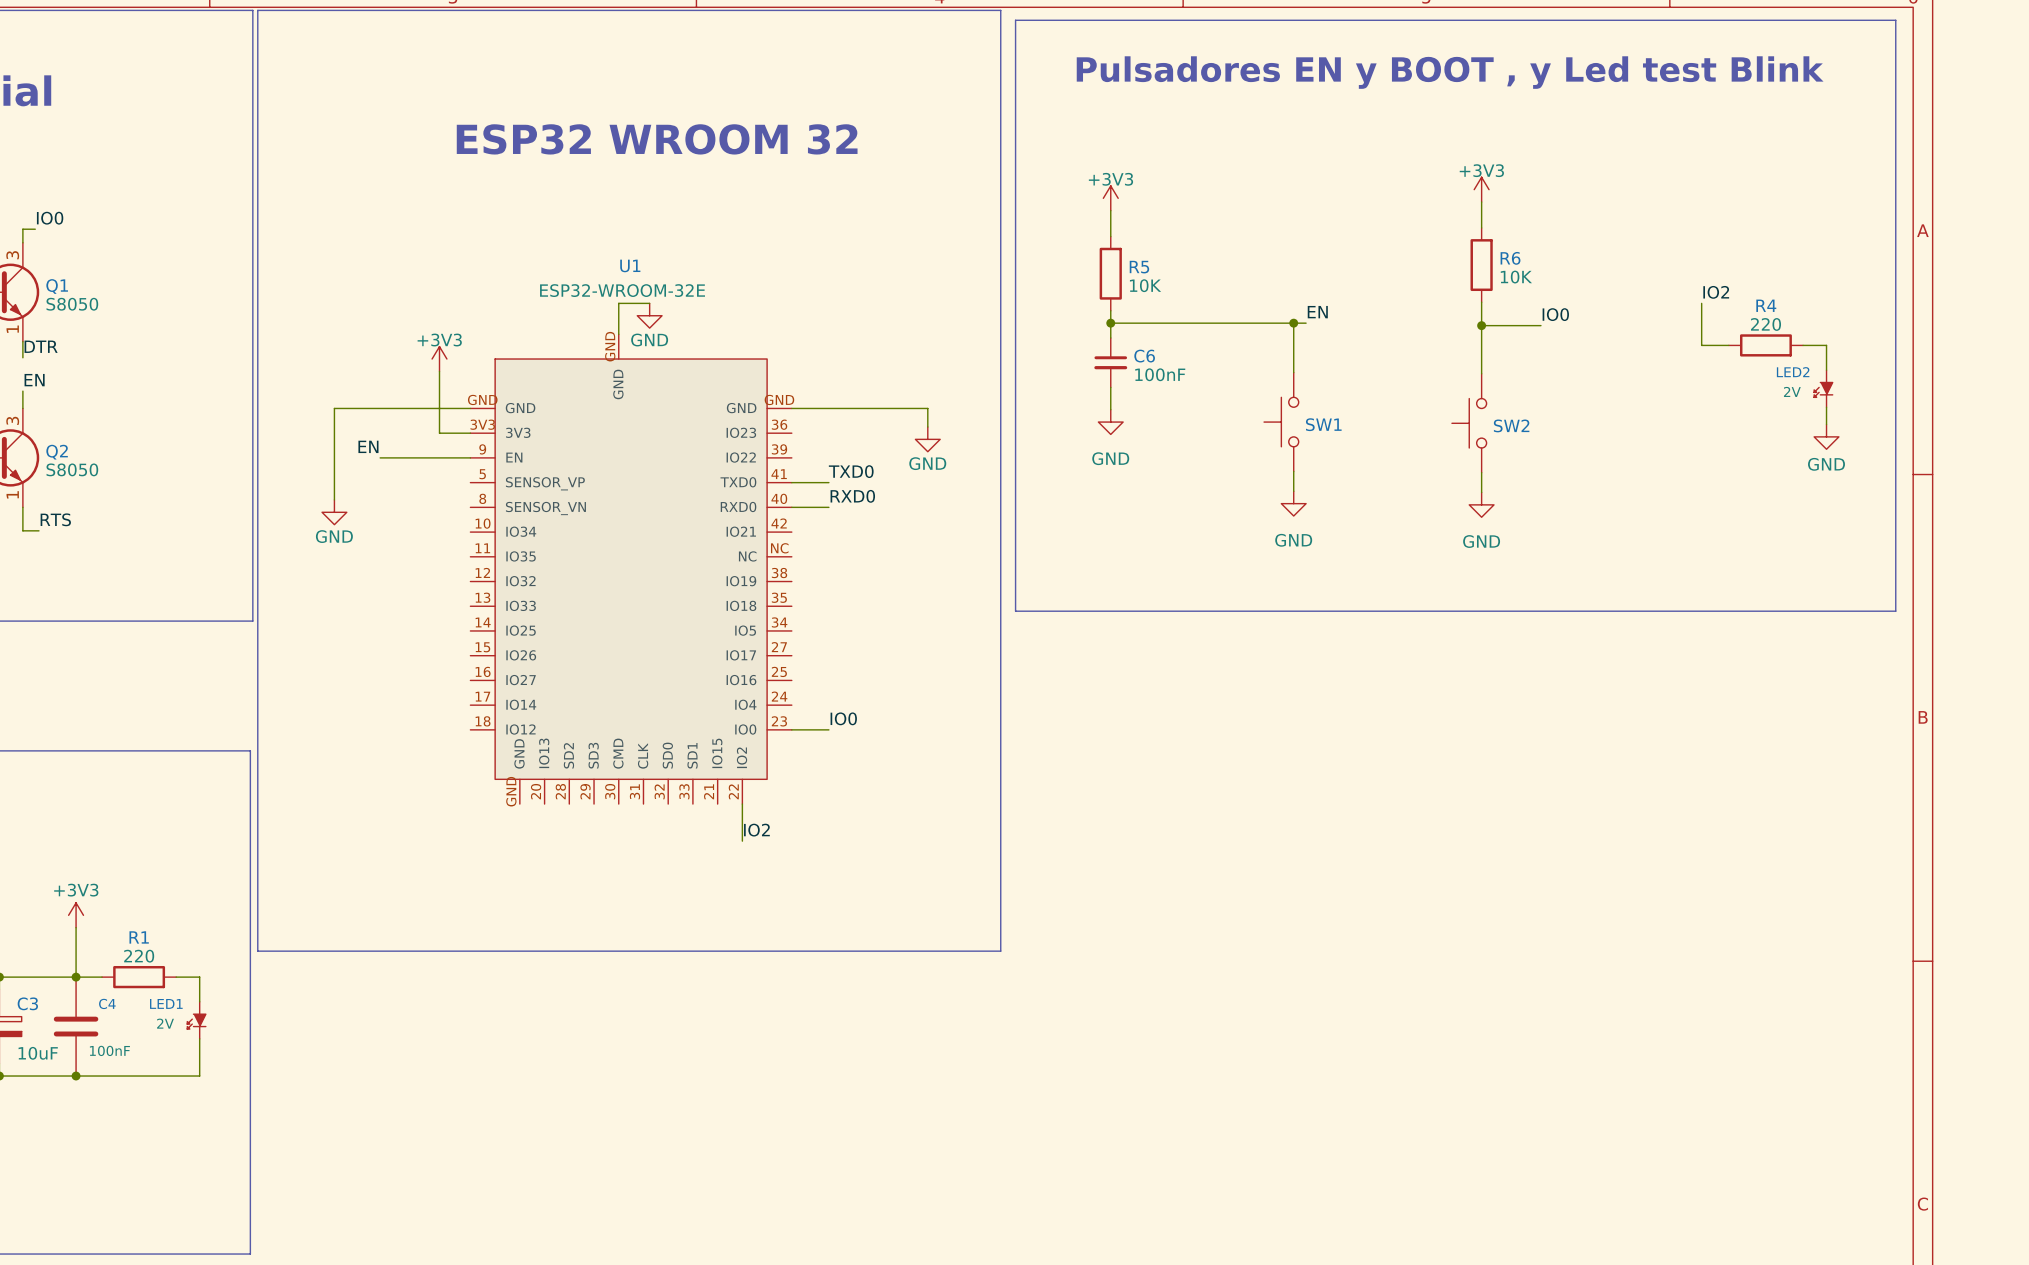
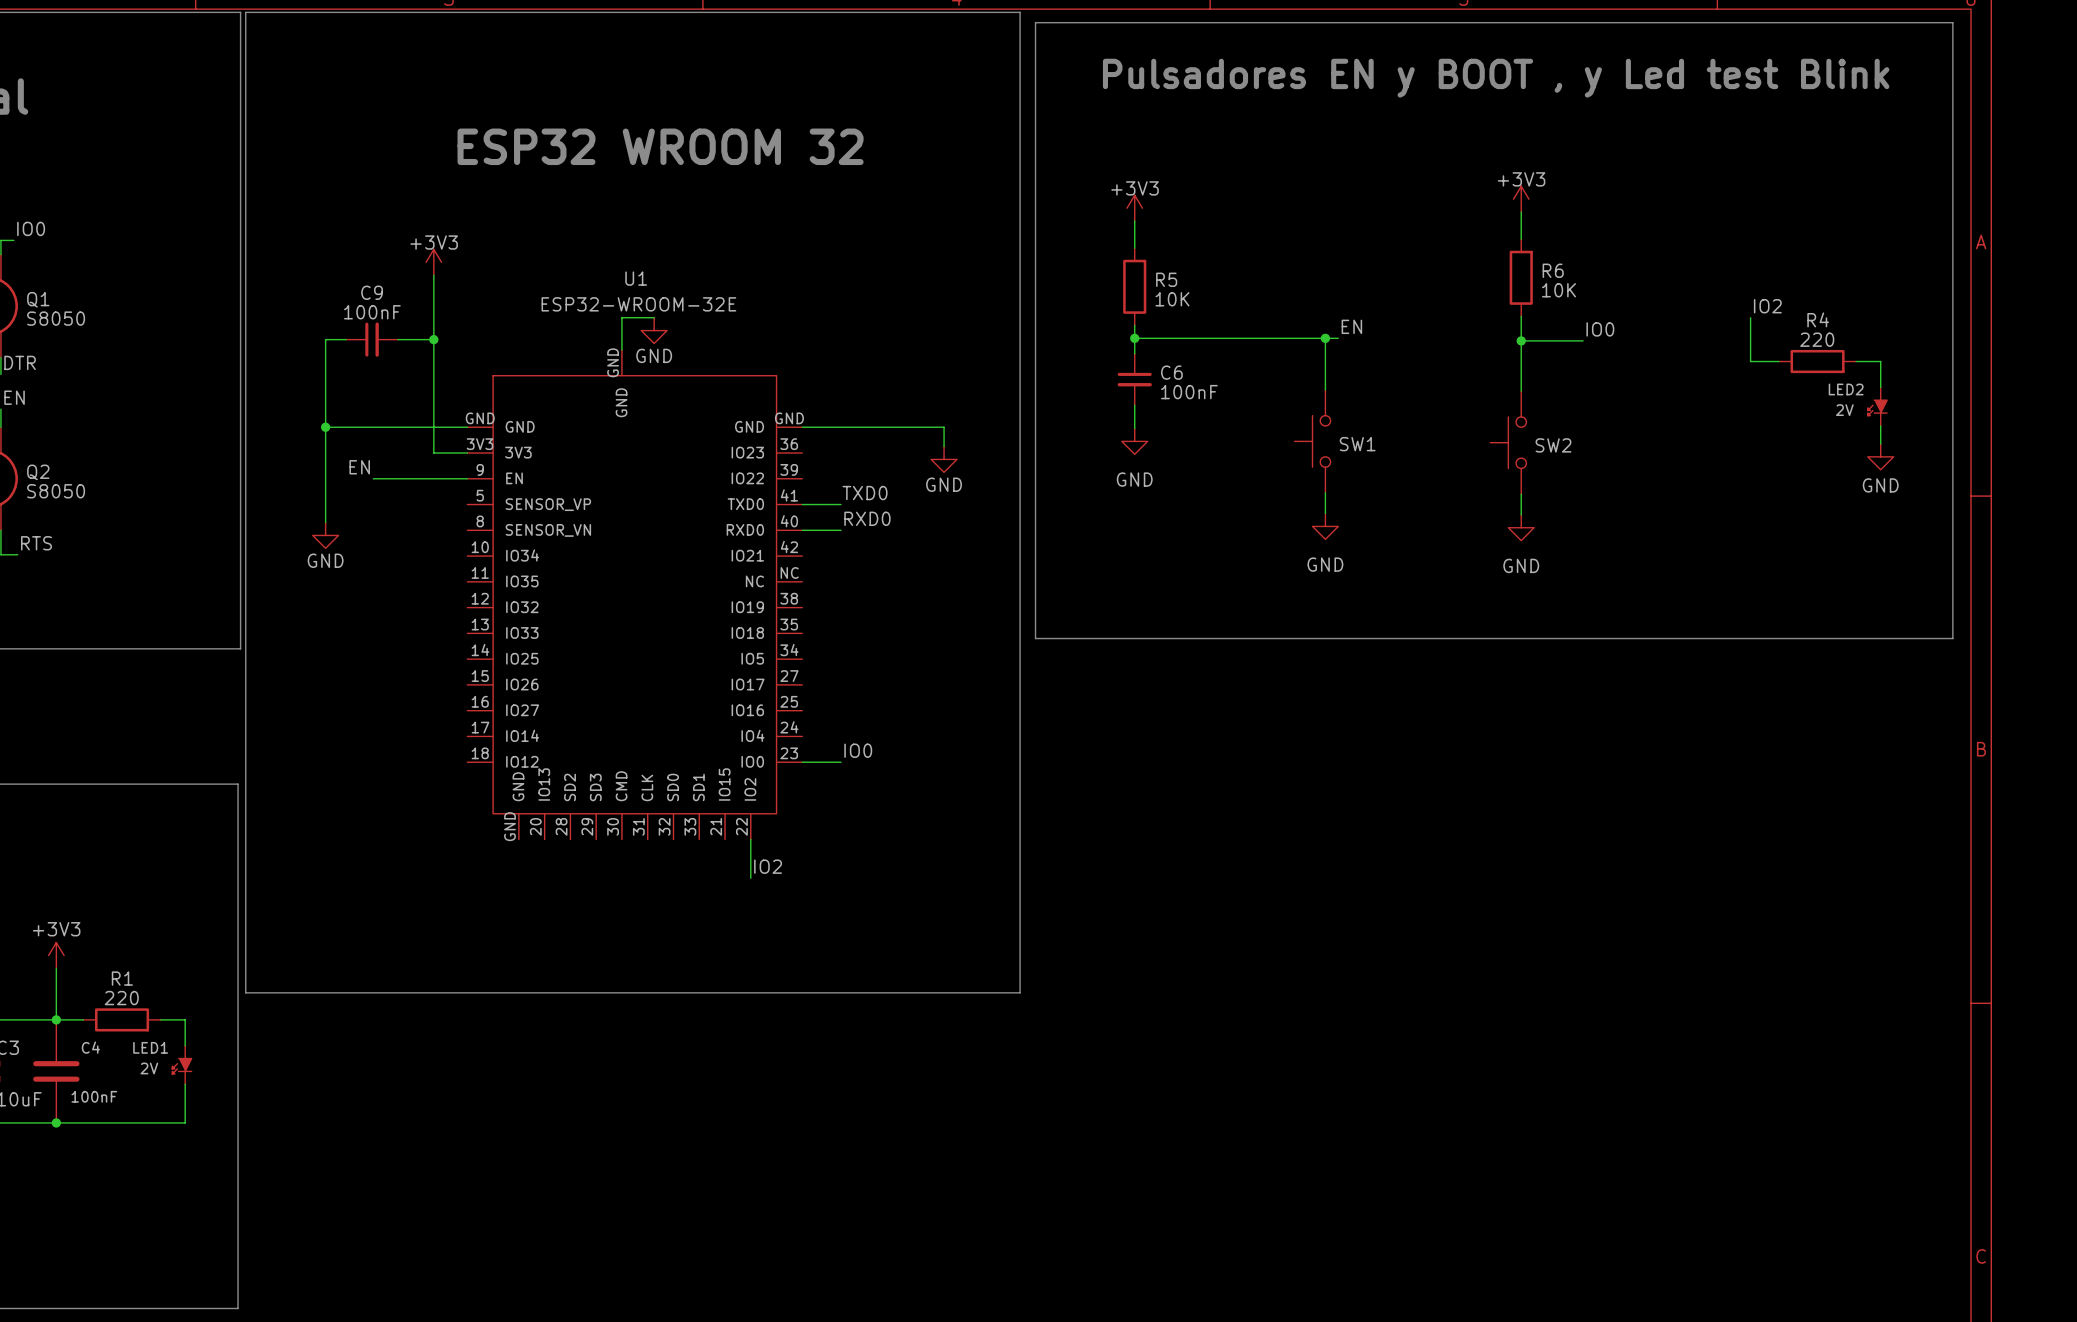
wire: none -> (346, 339) (325, 339) (325, 427)
C9: none -> 100nF (372, 339)
wire: none -> (397, 339) (433, 339)
junction: none -> (433, 339)
power symbol position: +3V3 (439, 359) -> +3V3 (433, 262)
wire: (439, 371) (439, 433) -> (433, 275) (435, 453)
junction: none -> (325, 427)

